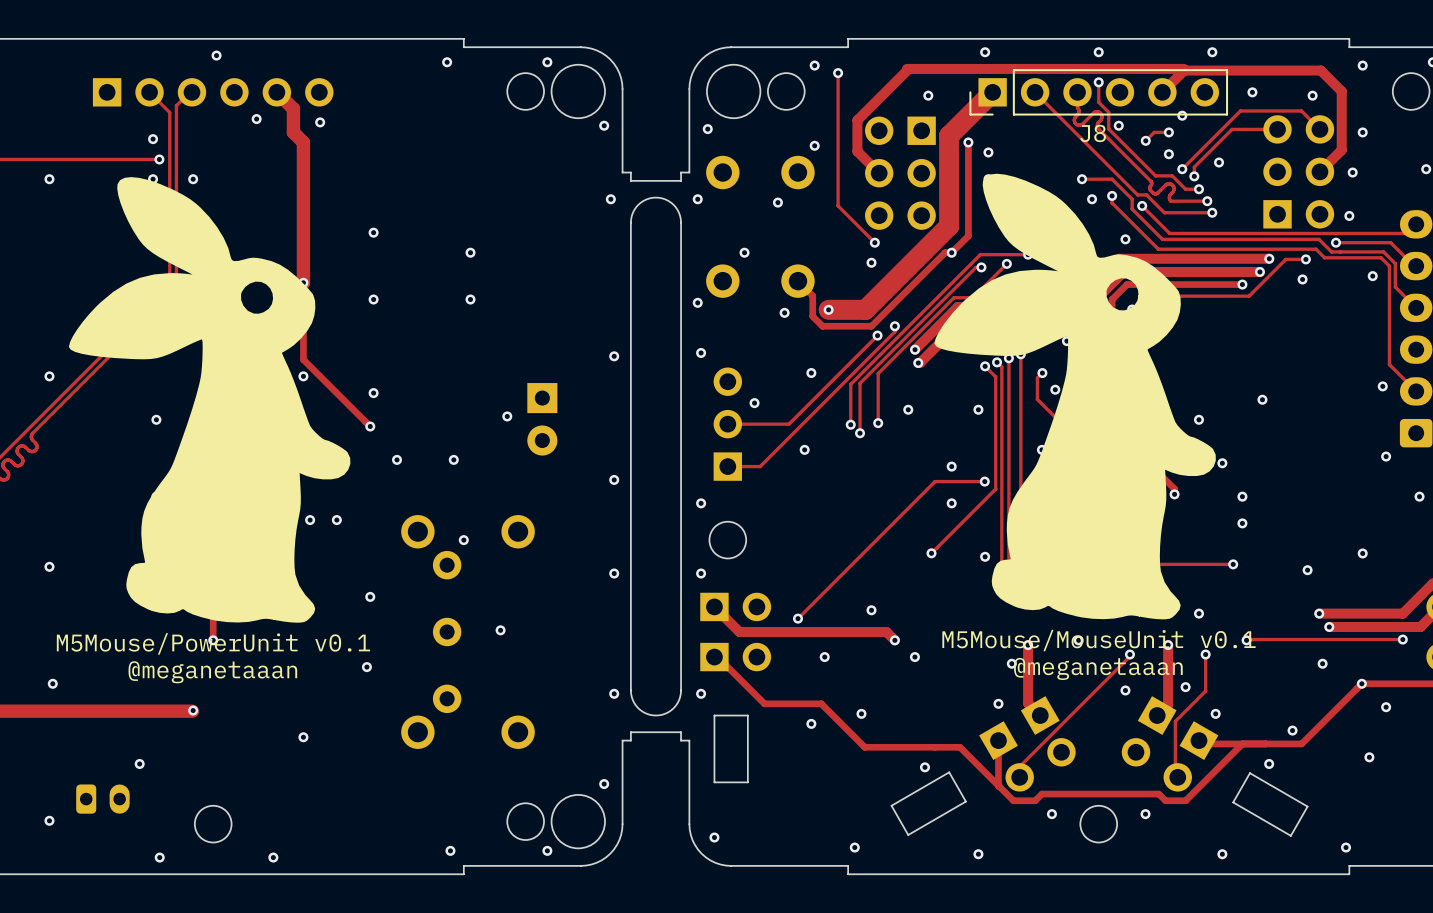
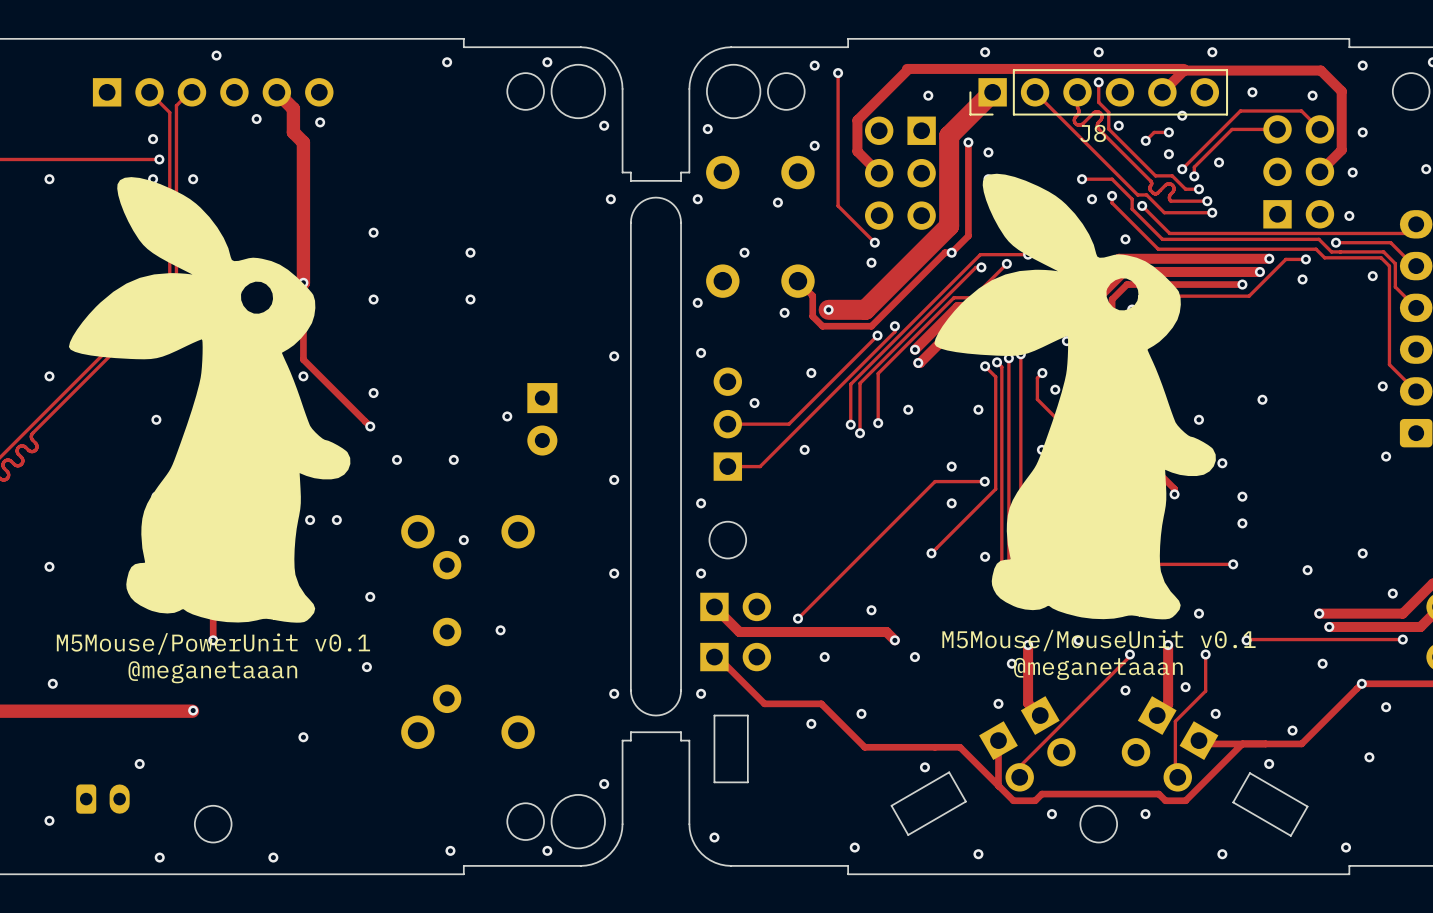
via: (1419, 496) -> none
via: none -> (1392, 593)

